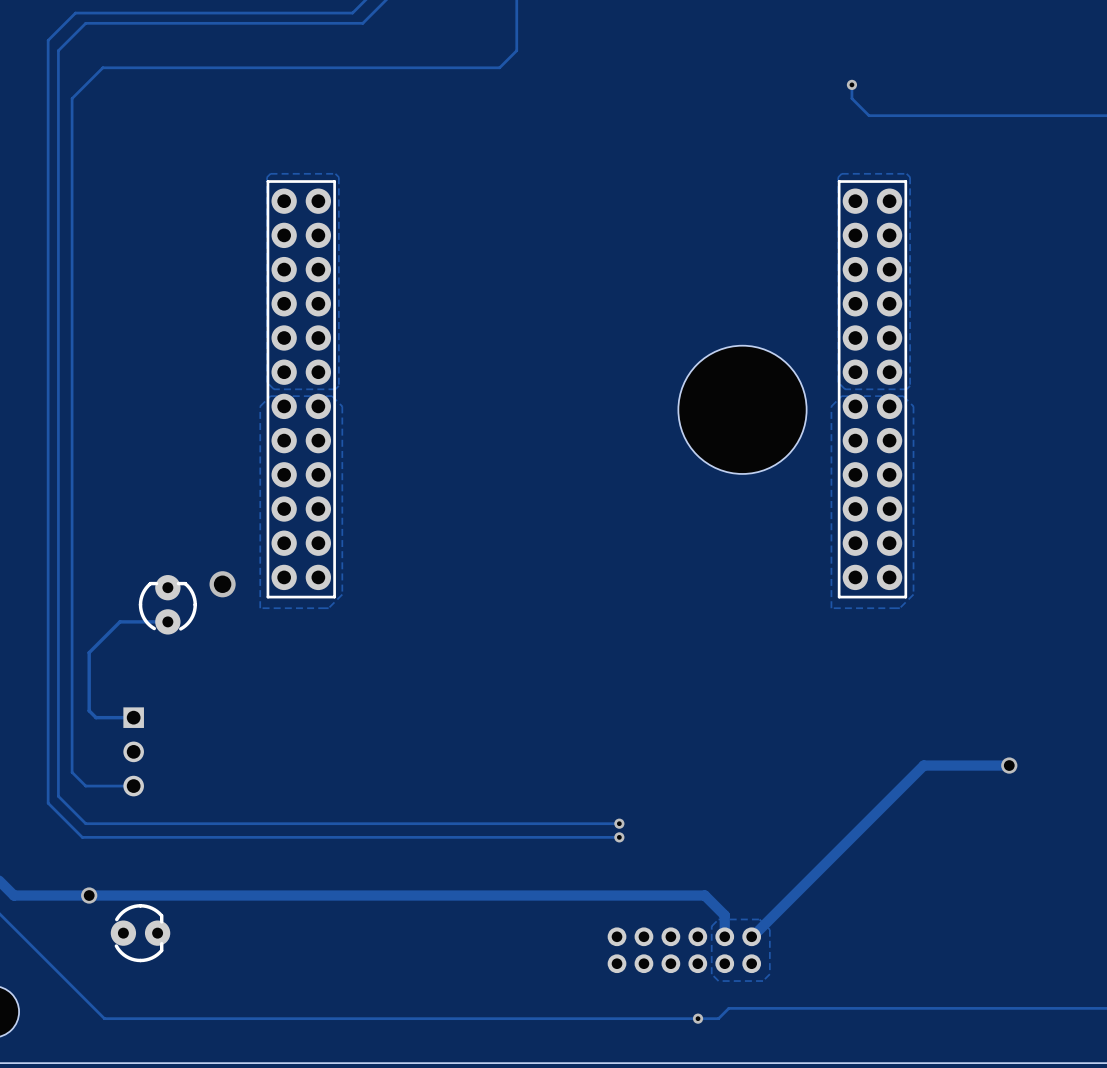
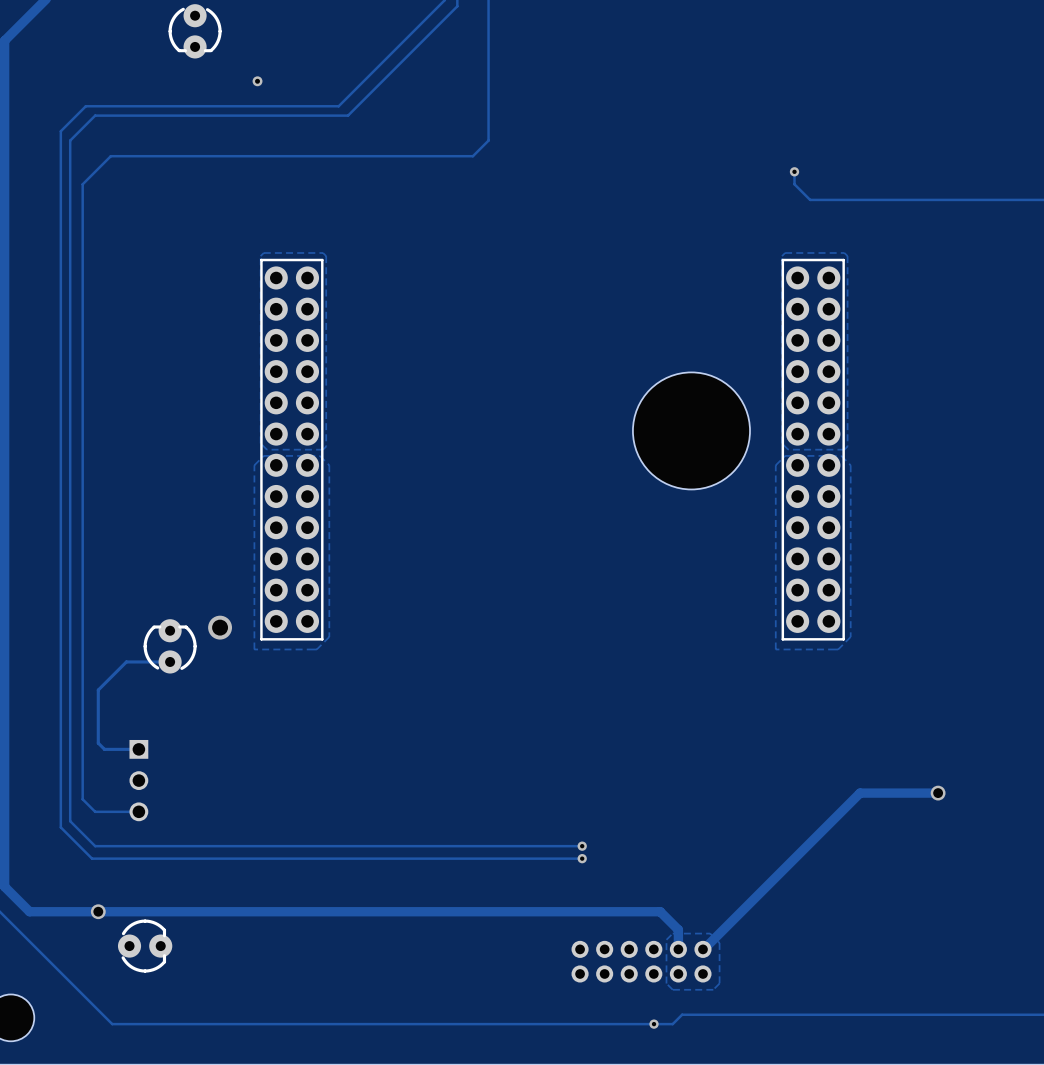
hole position: (742, 409) -> (691, 430)

